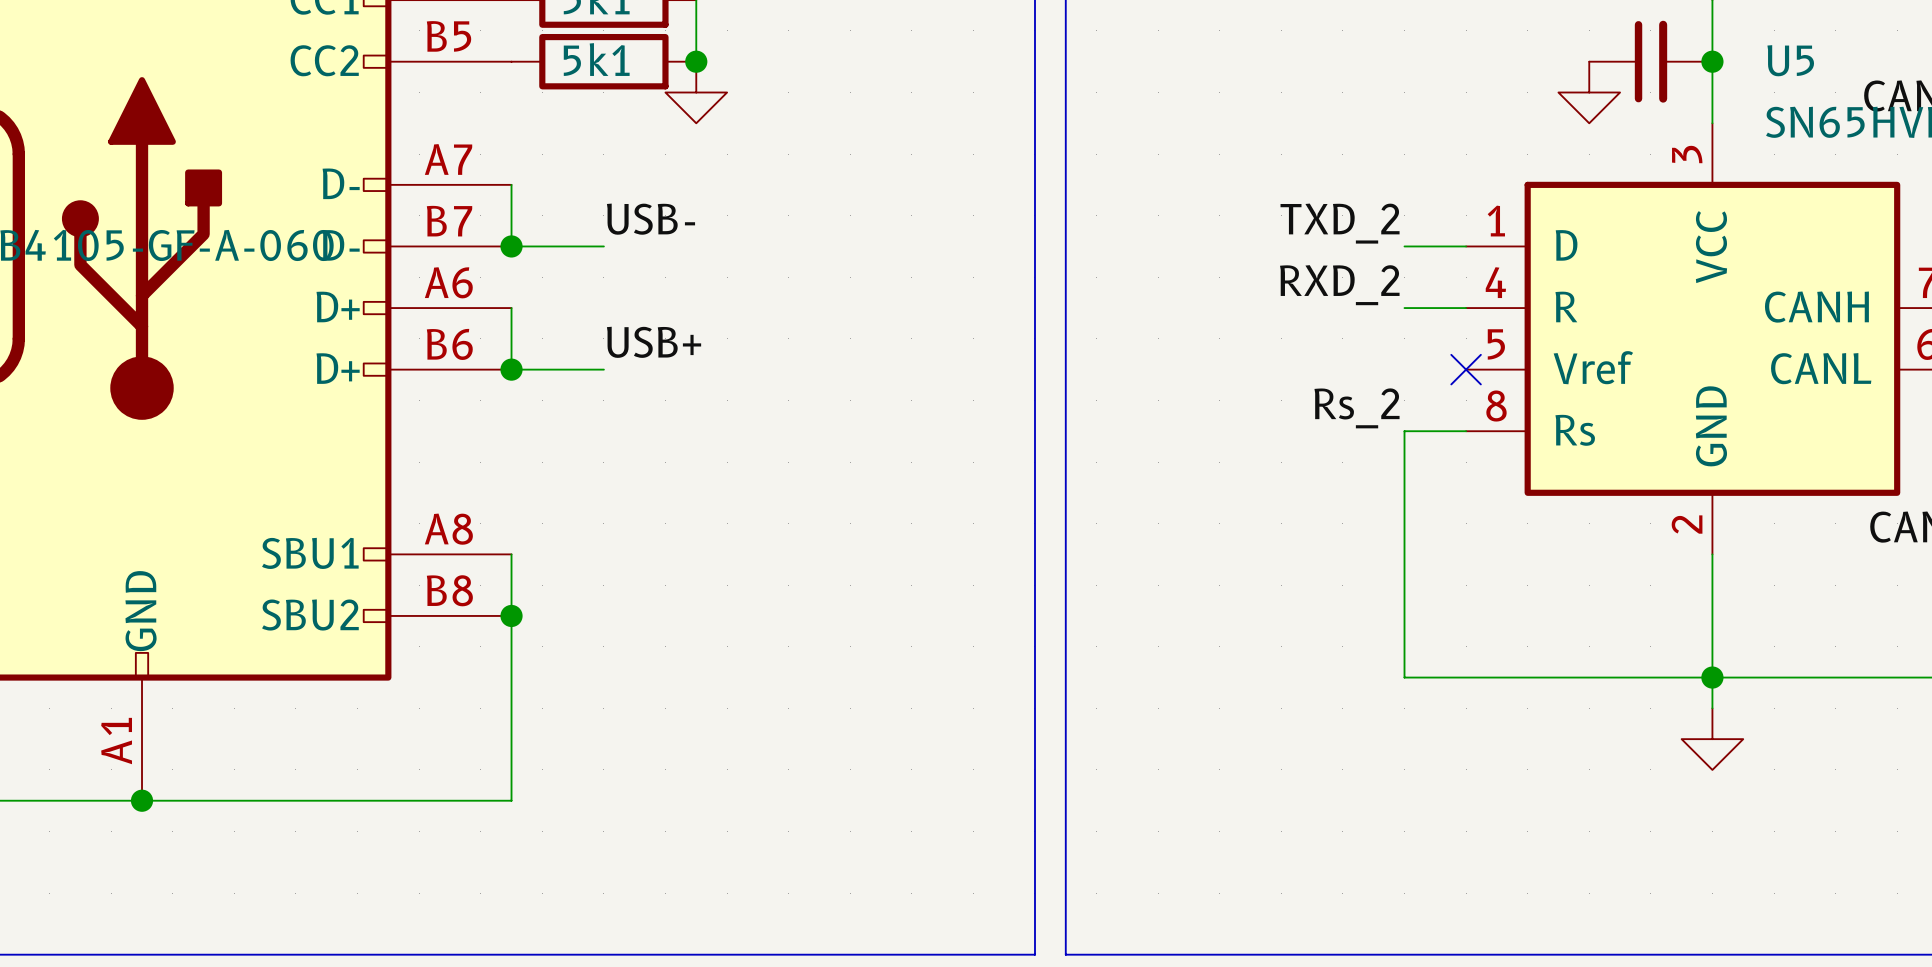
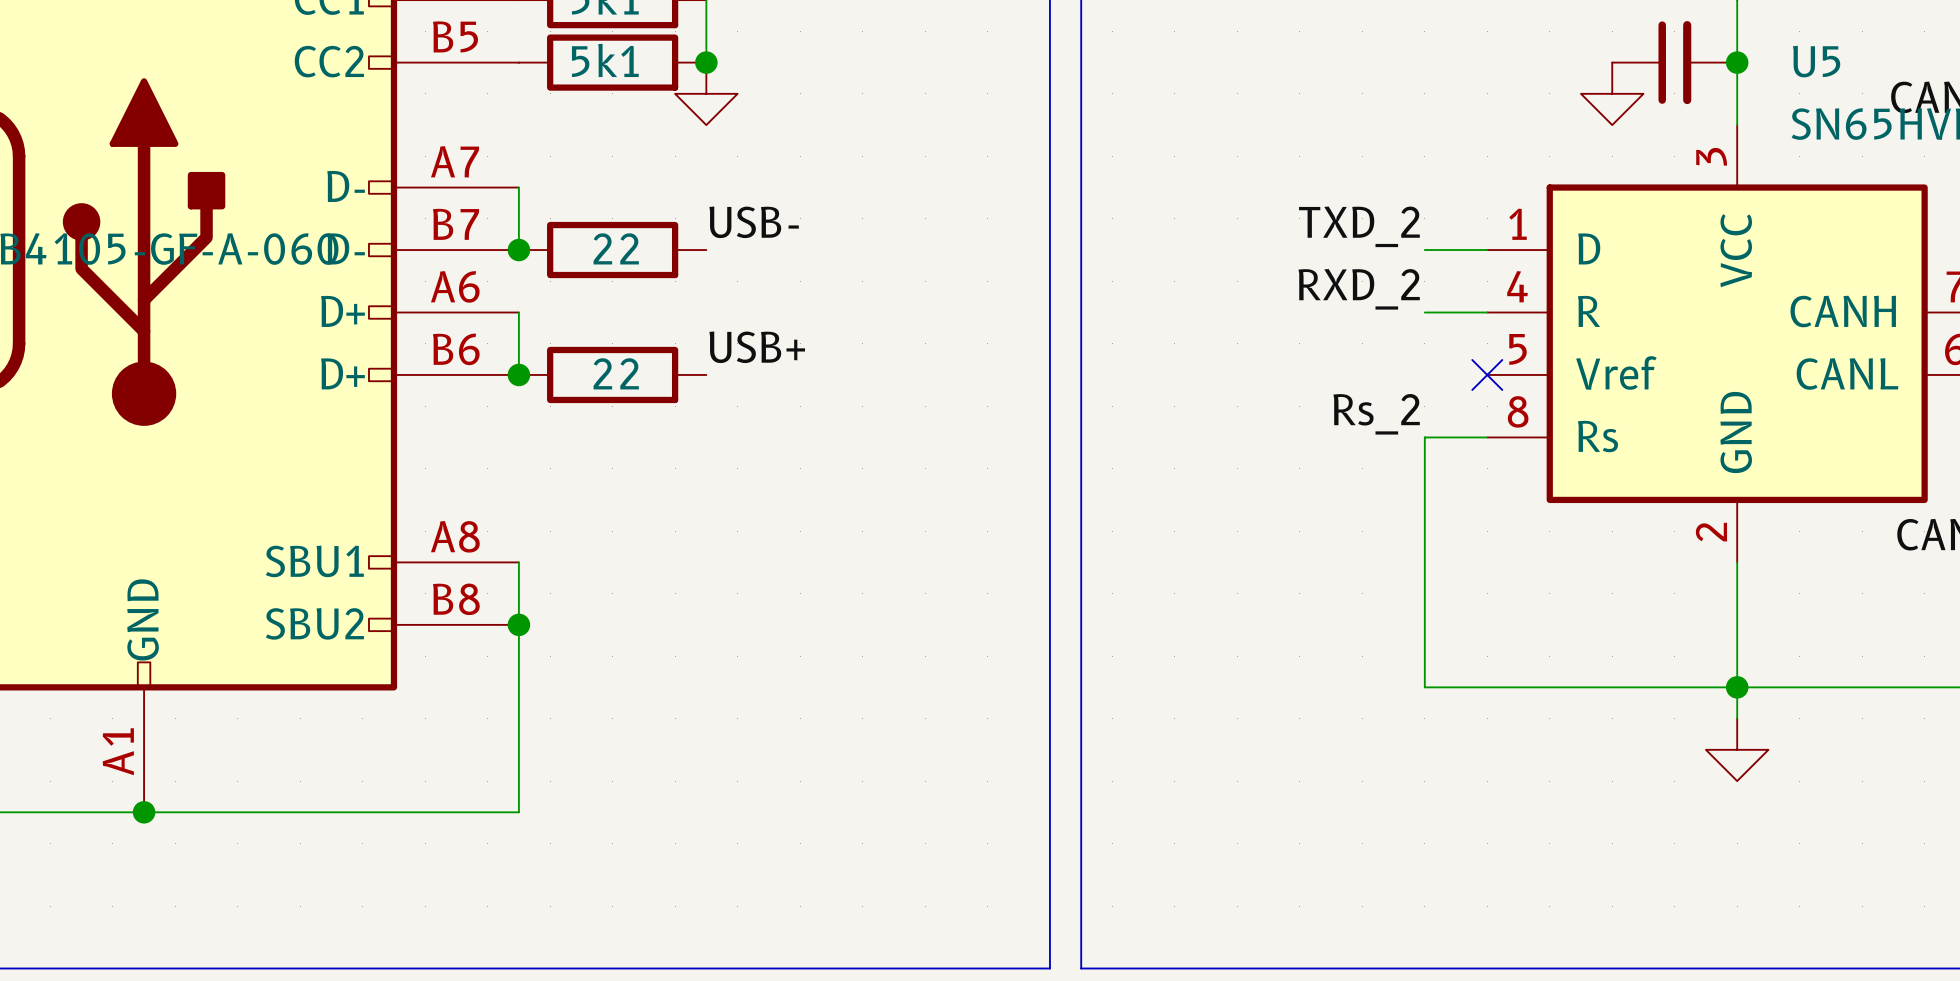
label position: USB- (650, 219) -> USB- (754, 222)
wire: (511, 246) (603, 246) -> none
part: none -> 22 (612, 250)
label position: USB+ (654, 342) -> USB+ (757, 347)
wire: (511, 369) (603, 369) -> none
part: none -> 22 (612, 374)

